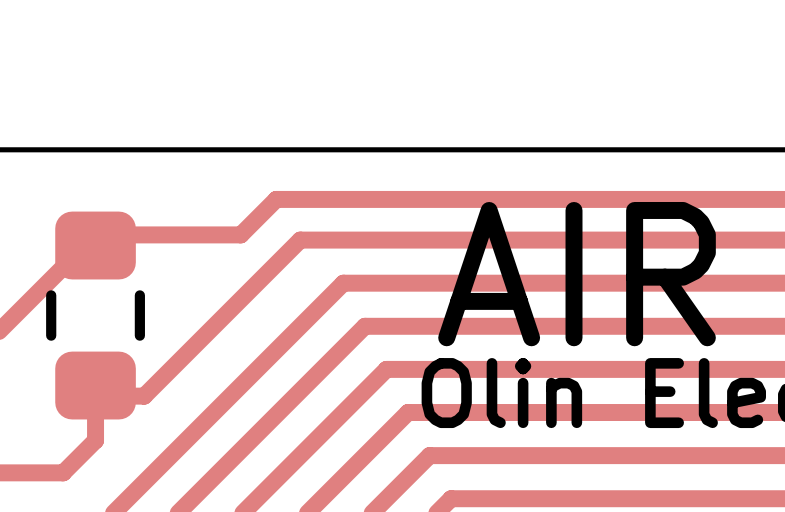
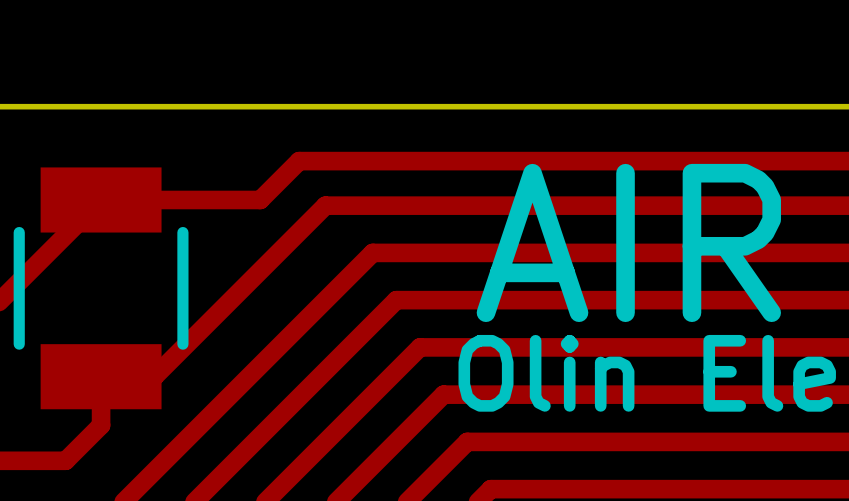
part footprint: [46, 211, 145, 420] -> [13, 167, 189, 410]

